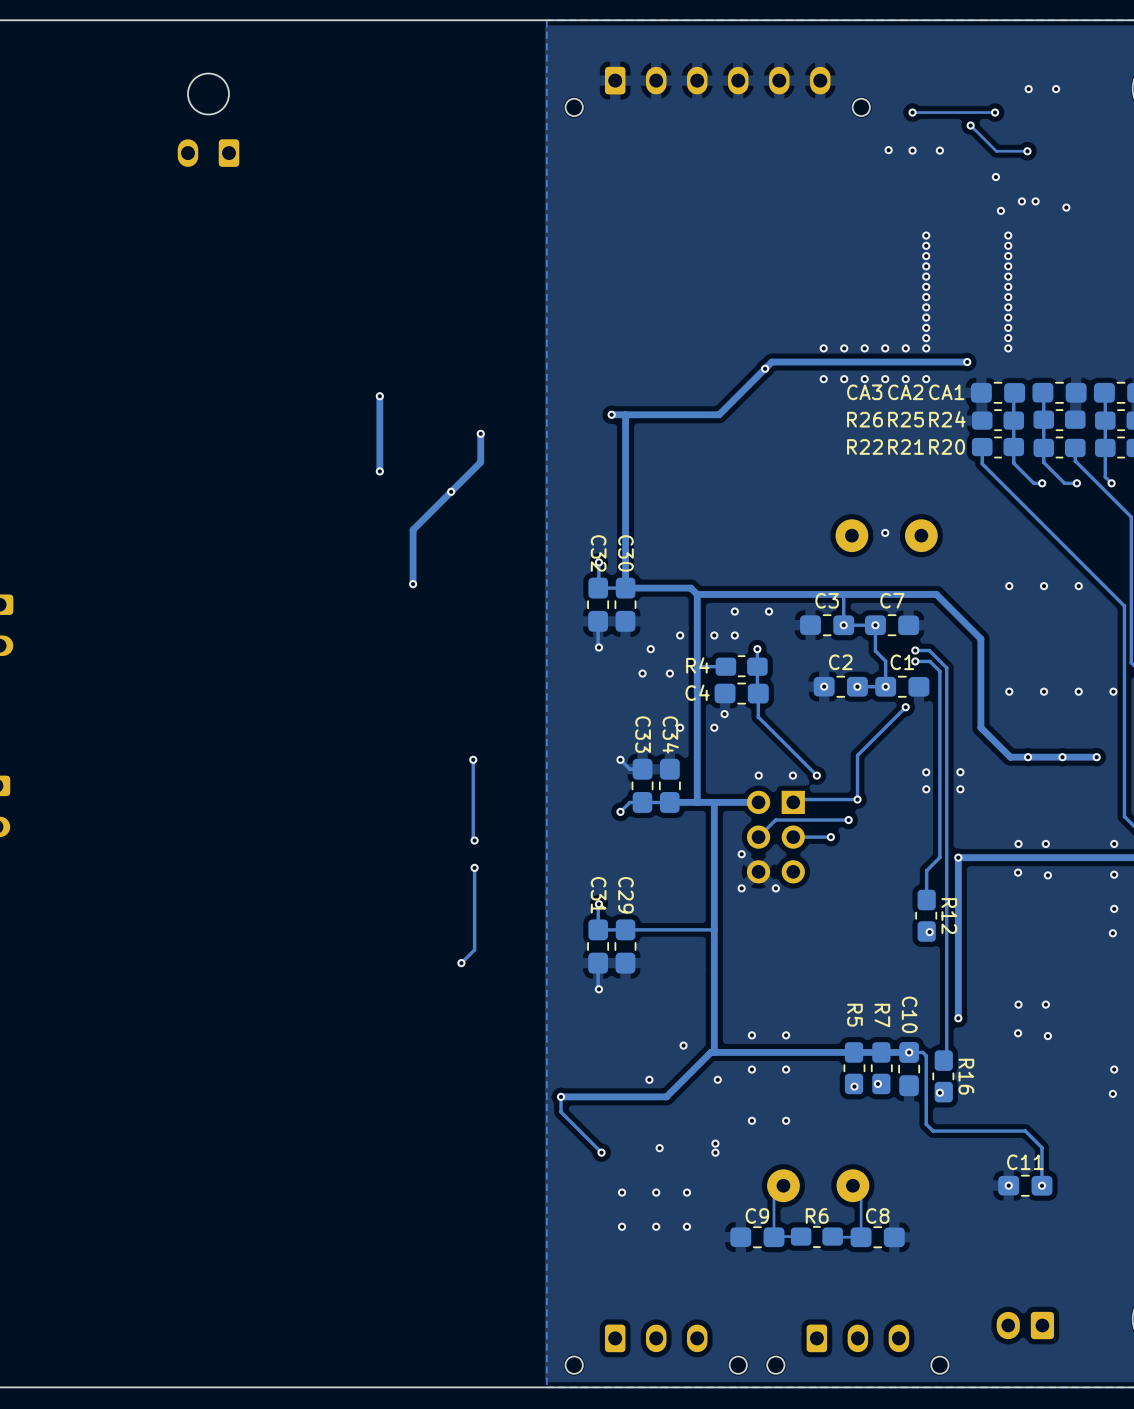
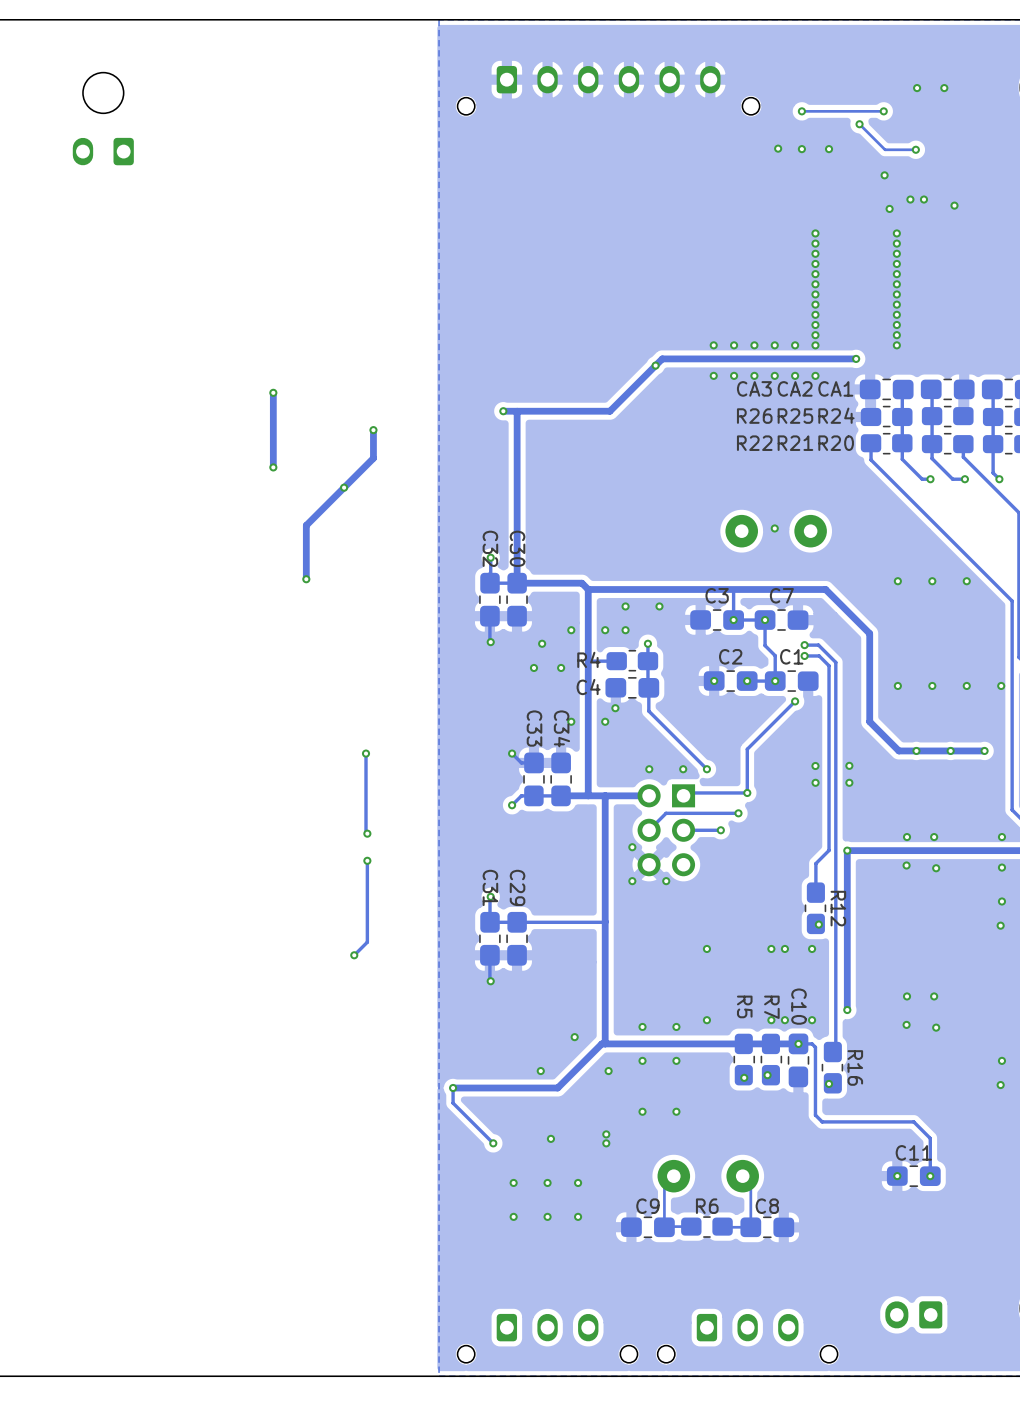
via: none -> (706, 948)
via: none -> (771, 948)
via: none -> (784, 948)
via: none -> (812, 948)
via: none -> (706, 1020)
via: none -> (771, 1020)
via: none -> (784, 1020)
via: none -> (812, 1020)

